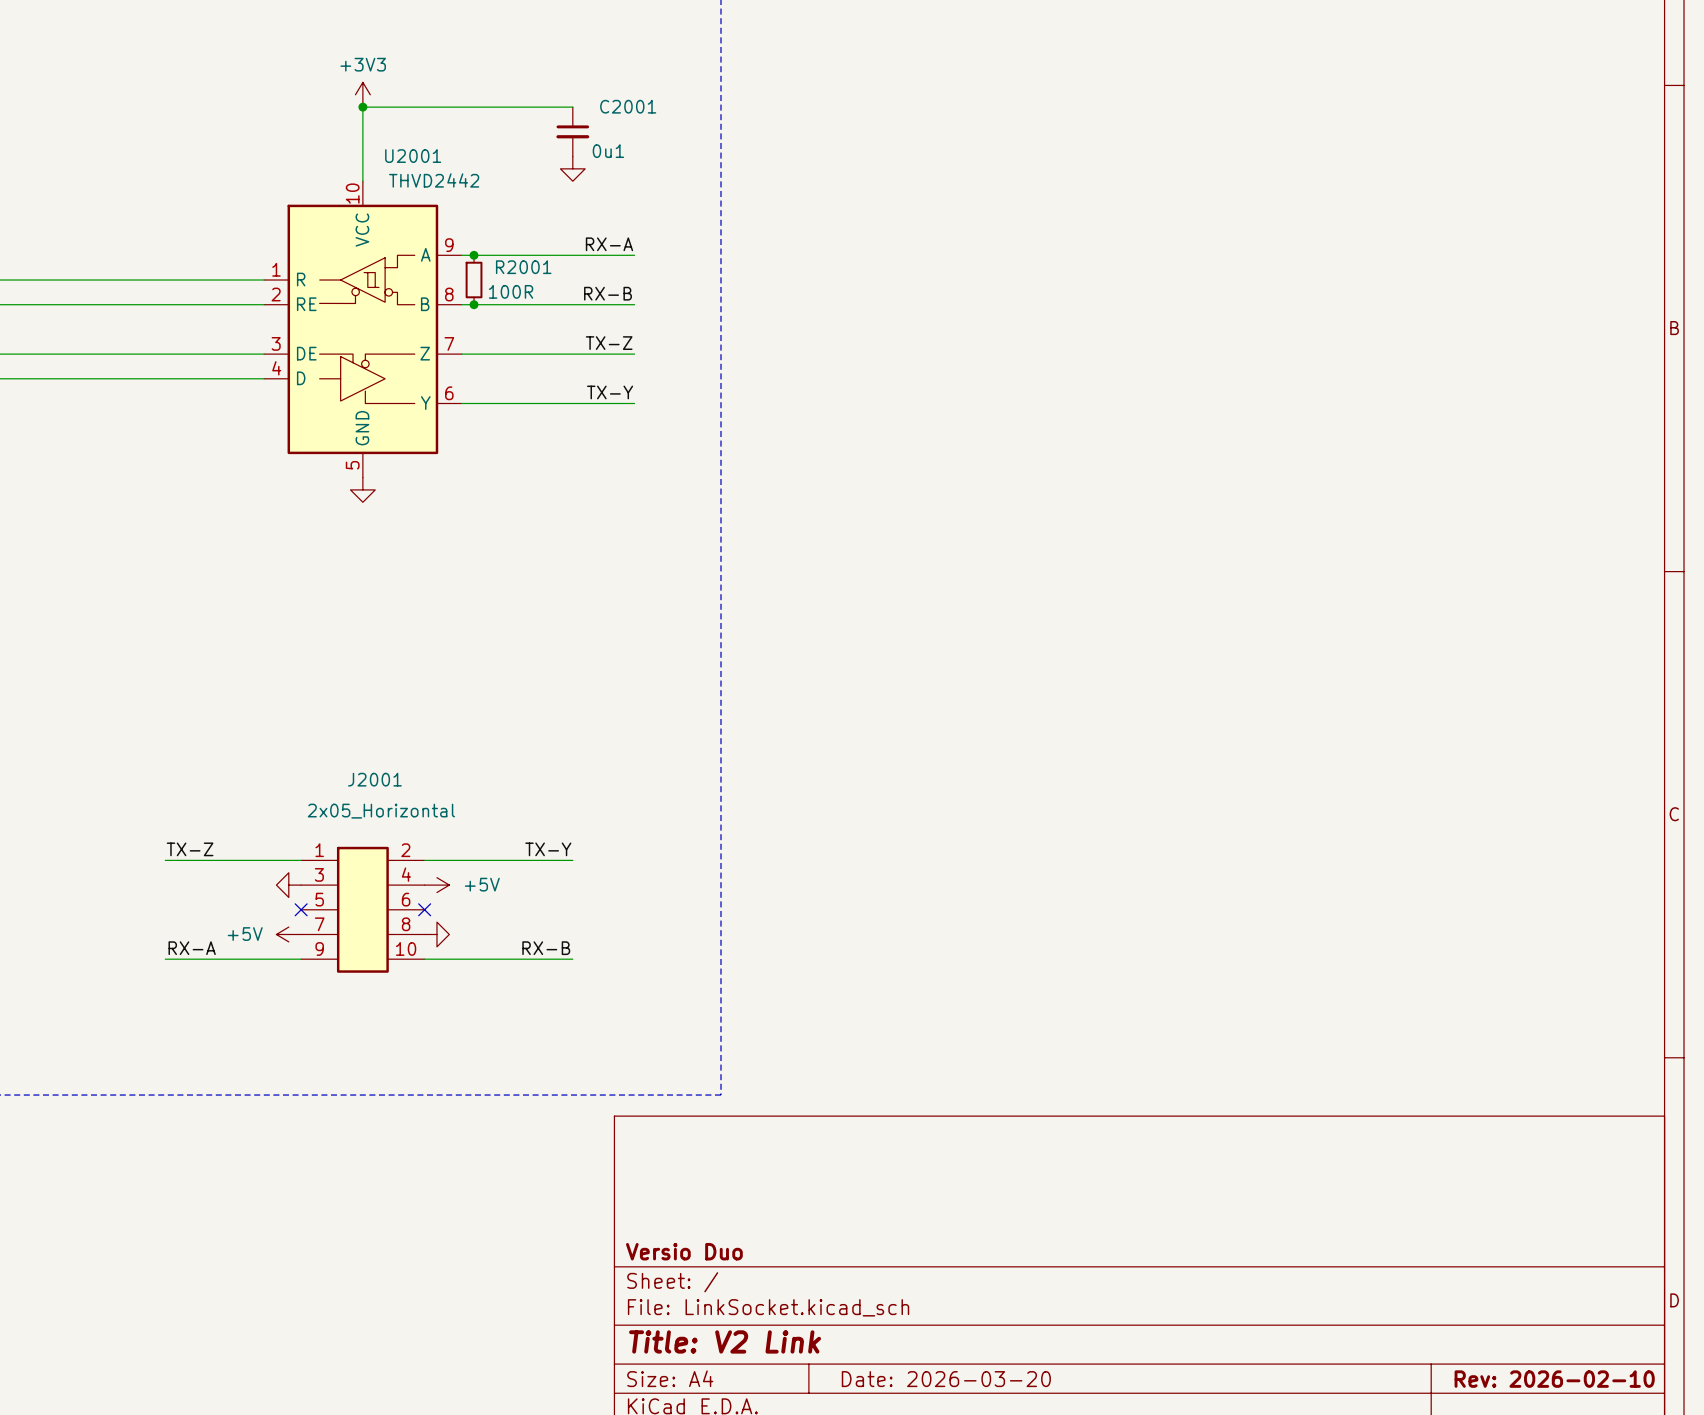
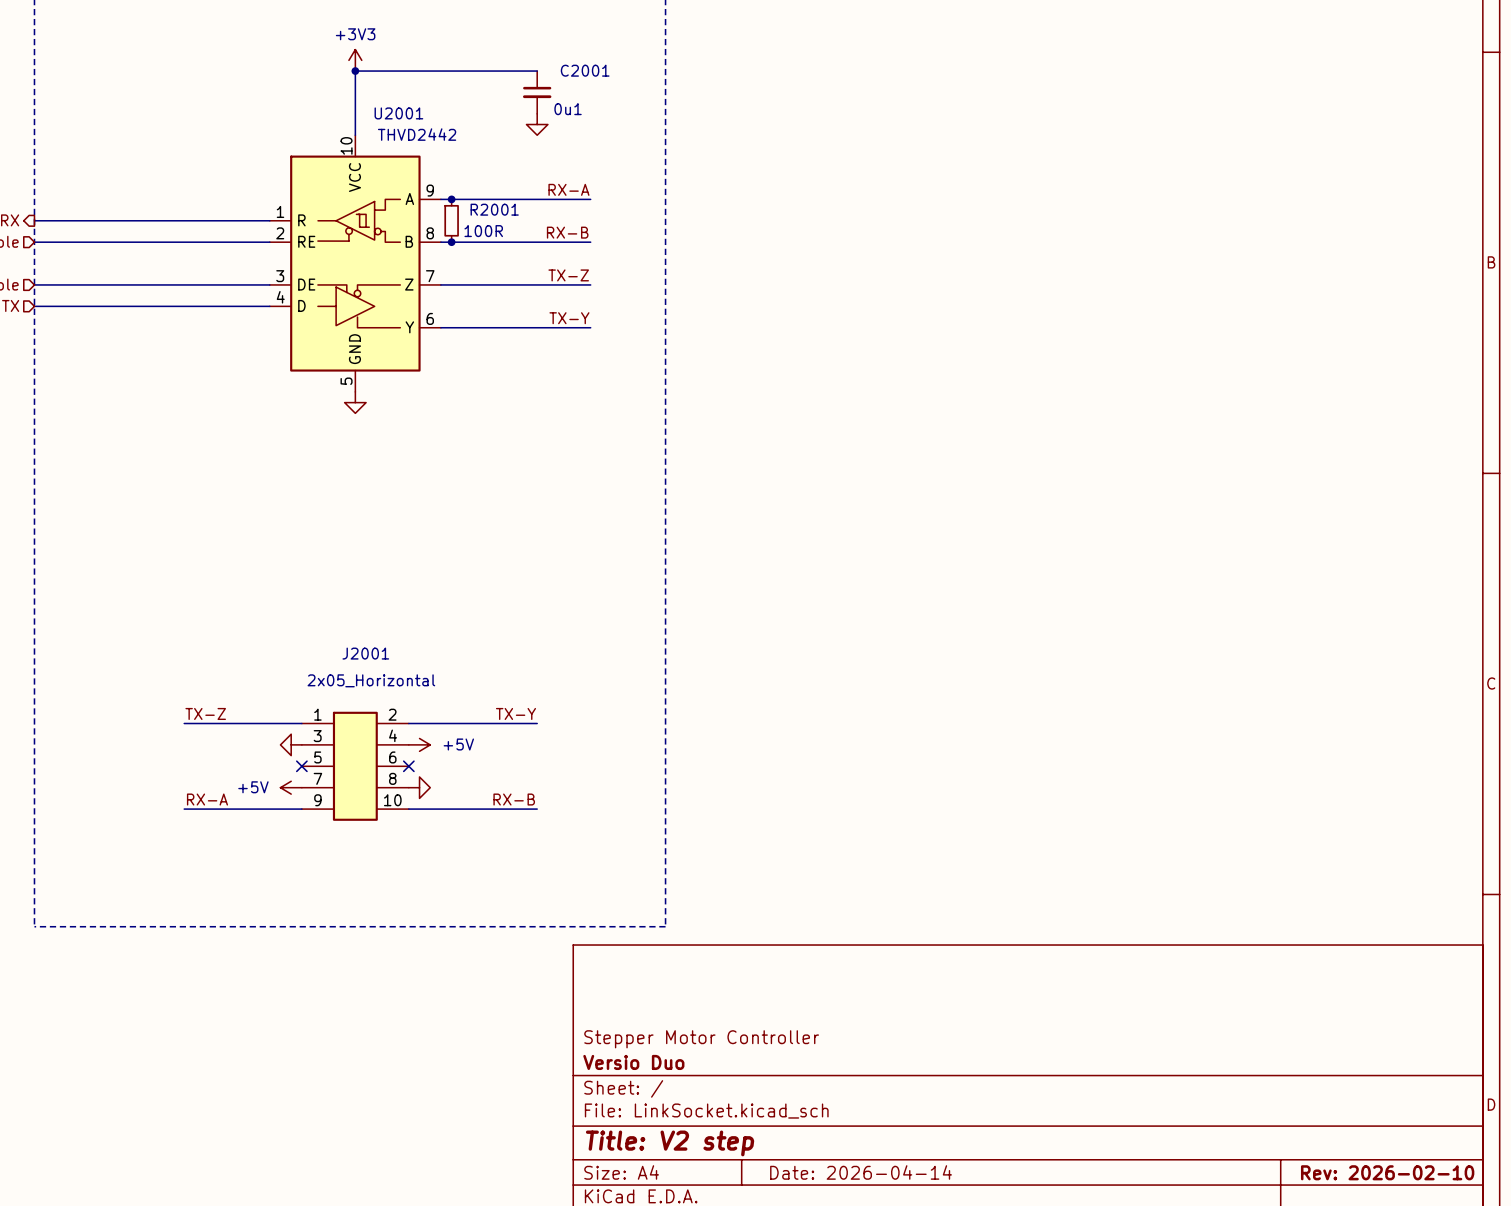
title block: none -> Stepper Motor Controller (701, 1039)
title block: Title: V2 Link (725, 1341) -> Title: V2 step (670, 1143)
title block: Date: 2026-03-20 (946, 1379) -> Date: 2026-04-14 (861, 1172)

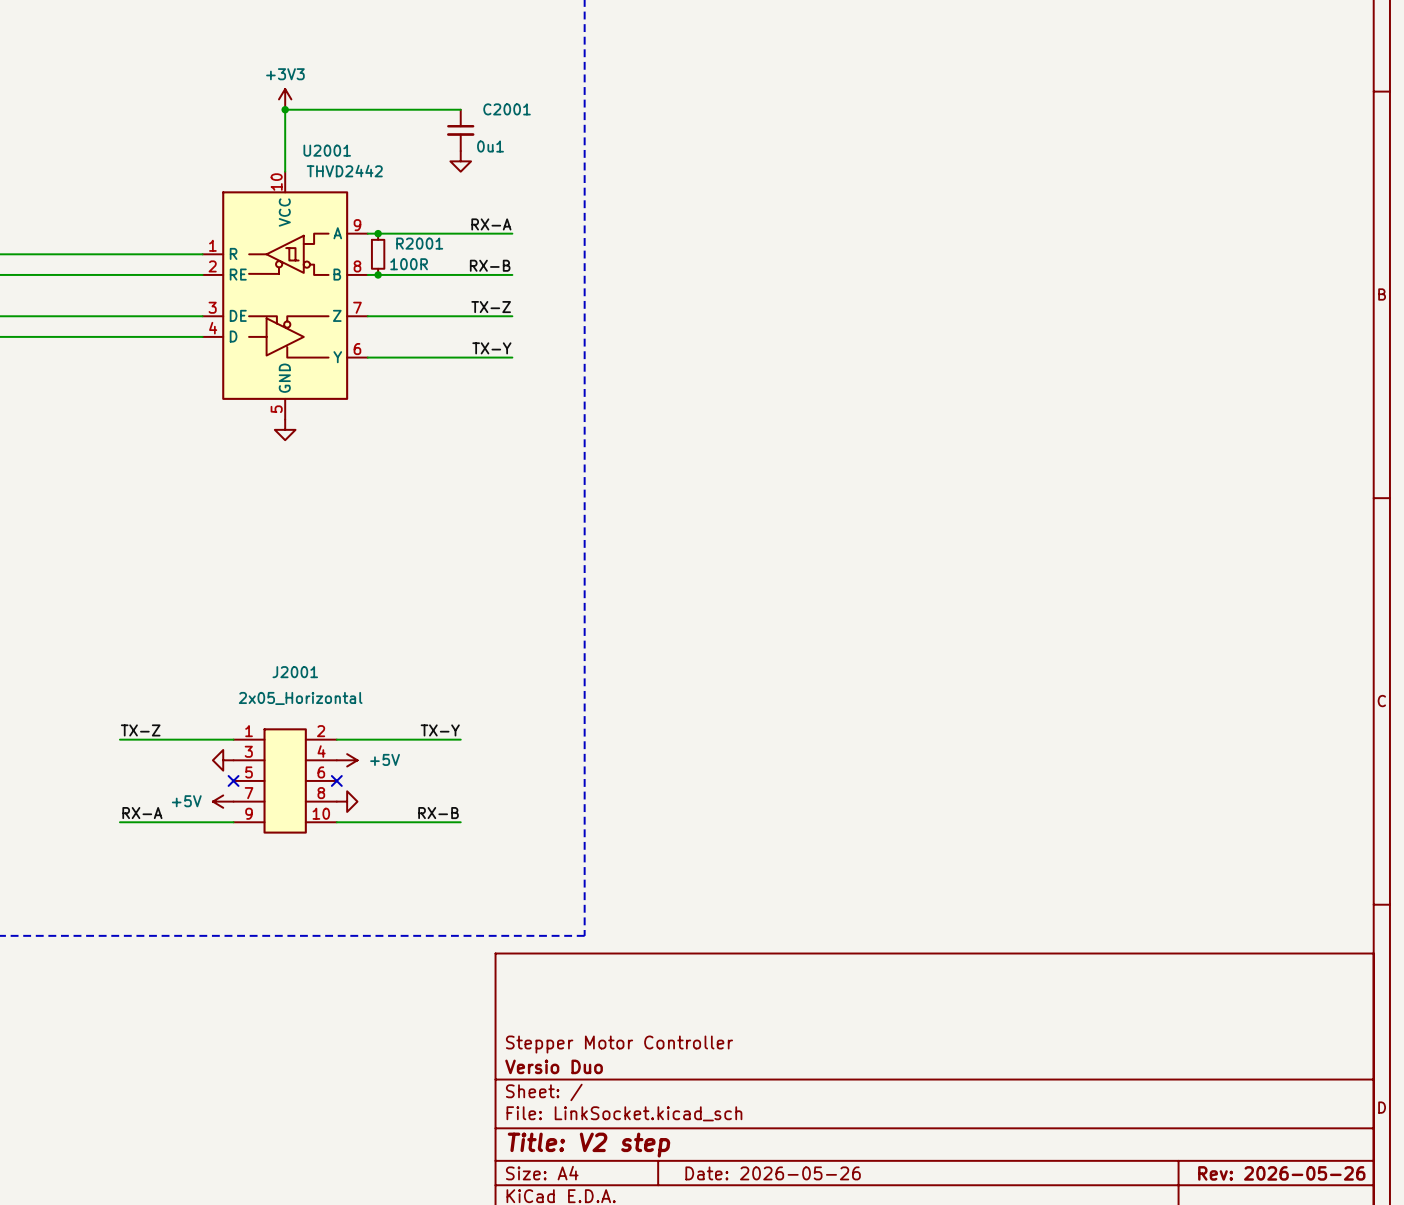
title block: Date: 2026-04-14 (861, 1172) -> Date: 2026-05-26 (773, 1173)
title block: Rev: 2026-02-10 (1387, 1172) -> Rev: 2026-05-26 (1281, 1173)

